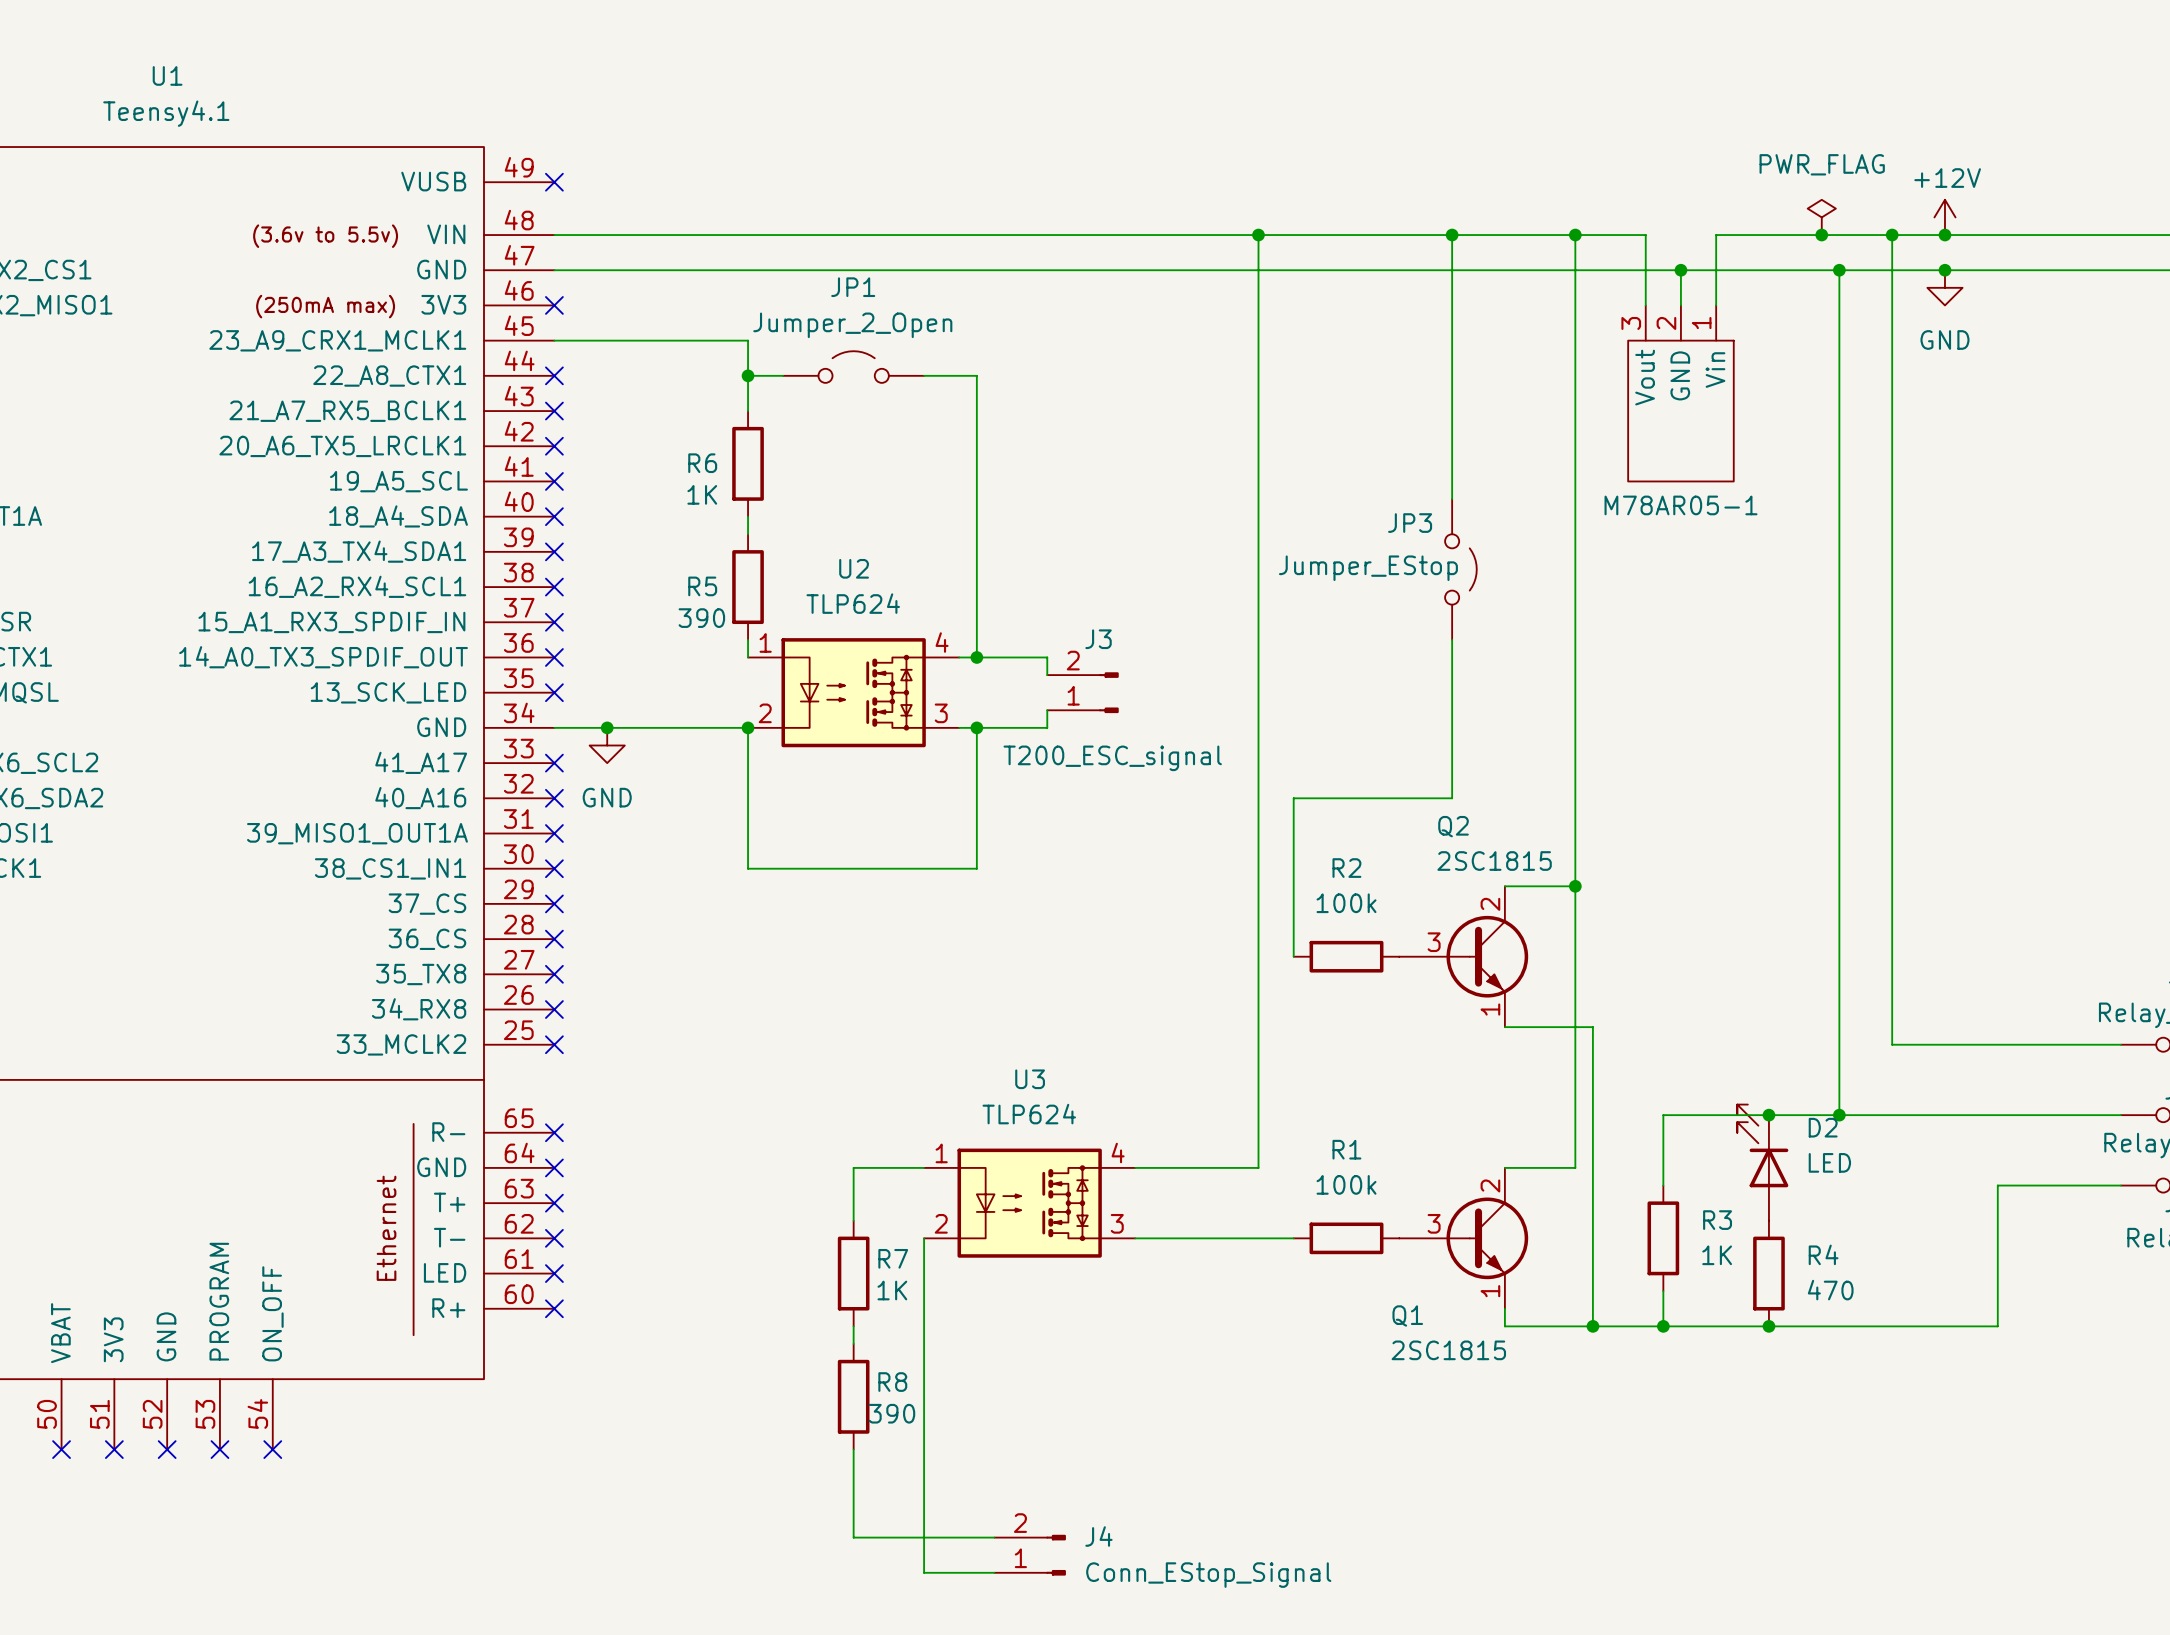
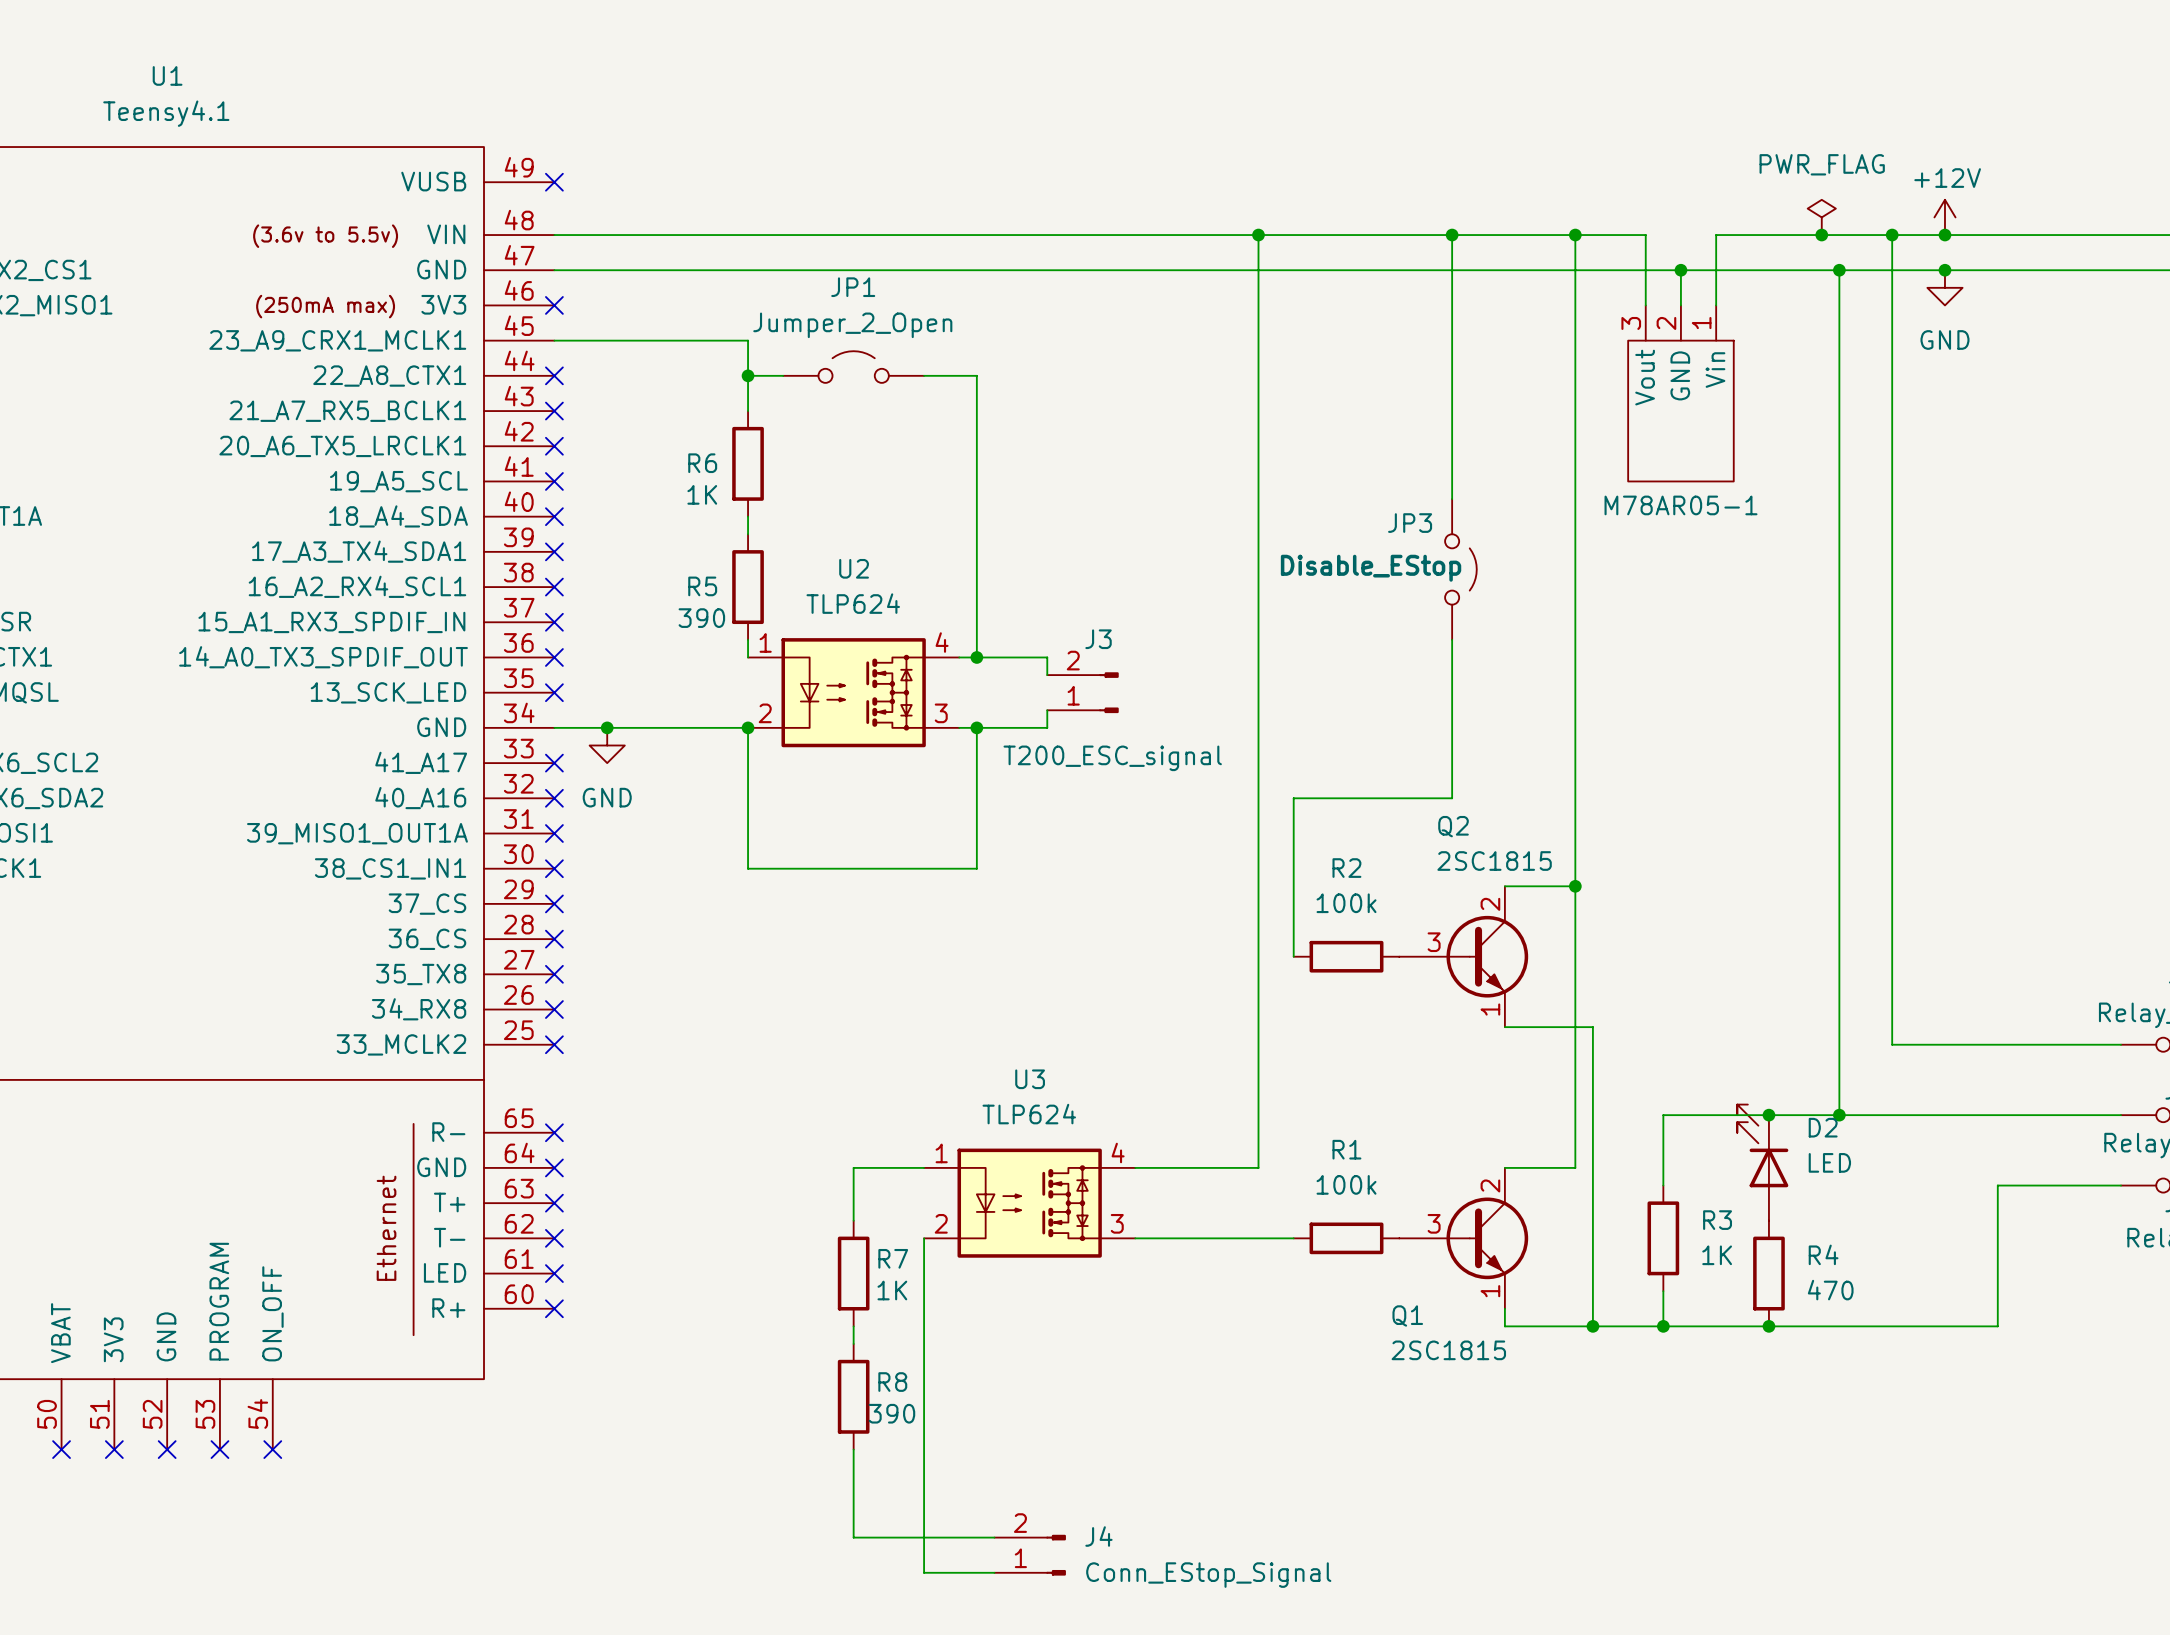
JP3 value: Jumper_EStop (1368, 568) -> Disable_EStop (1371, 568)

